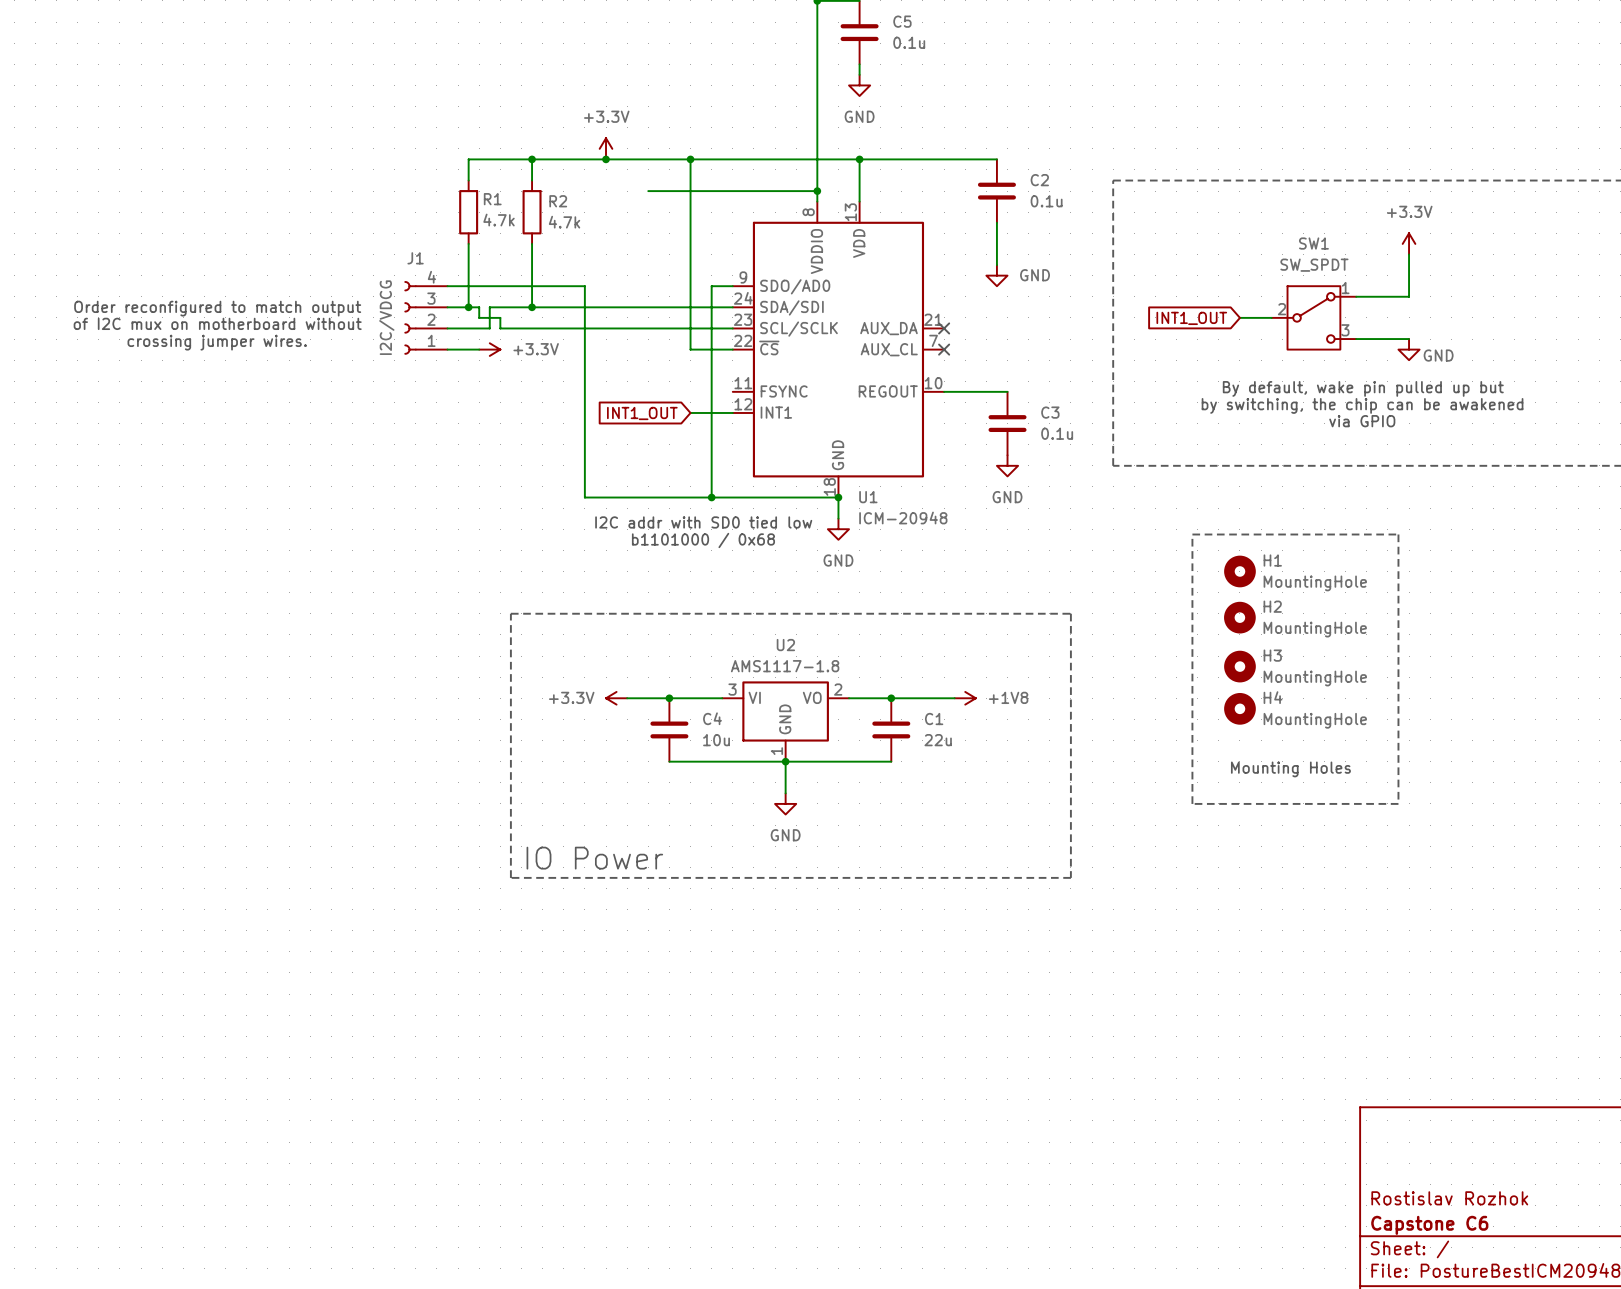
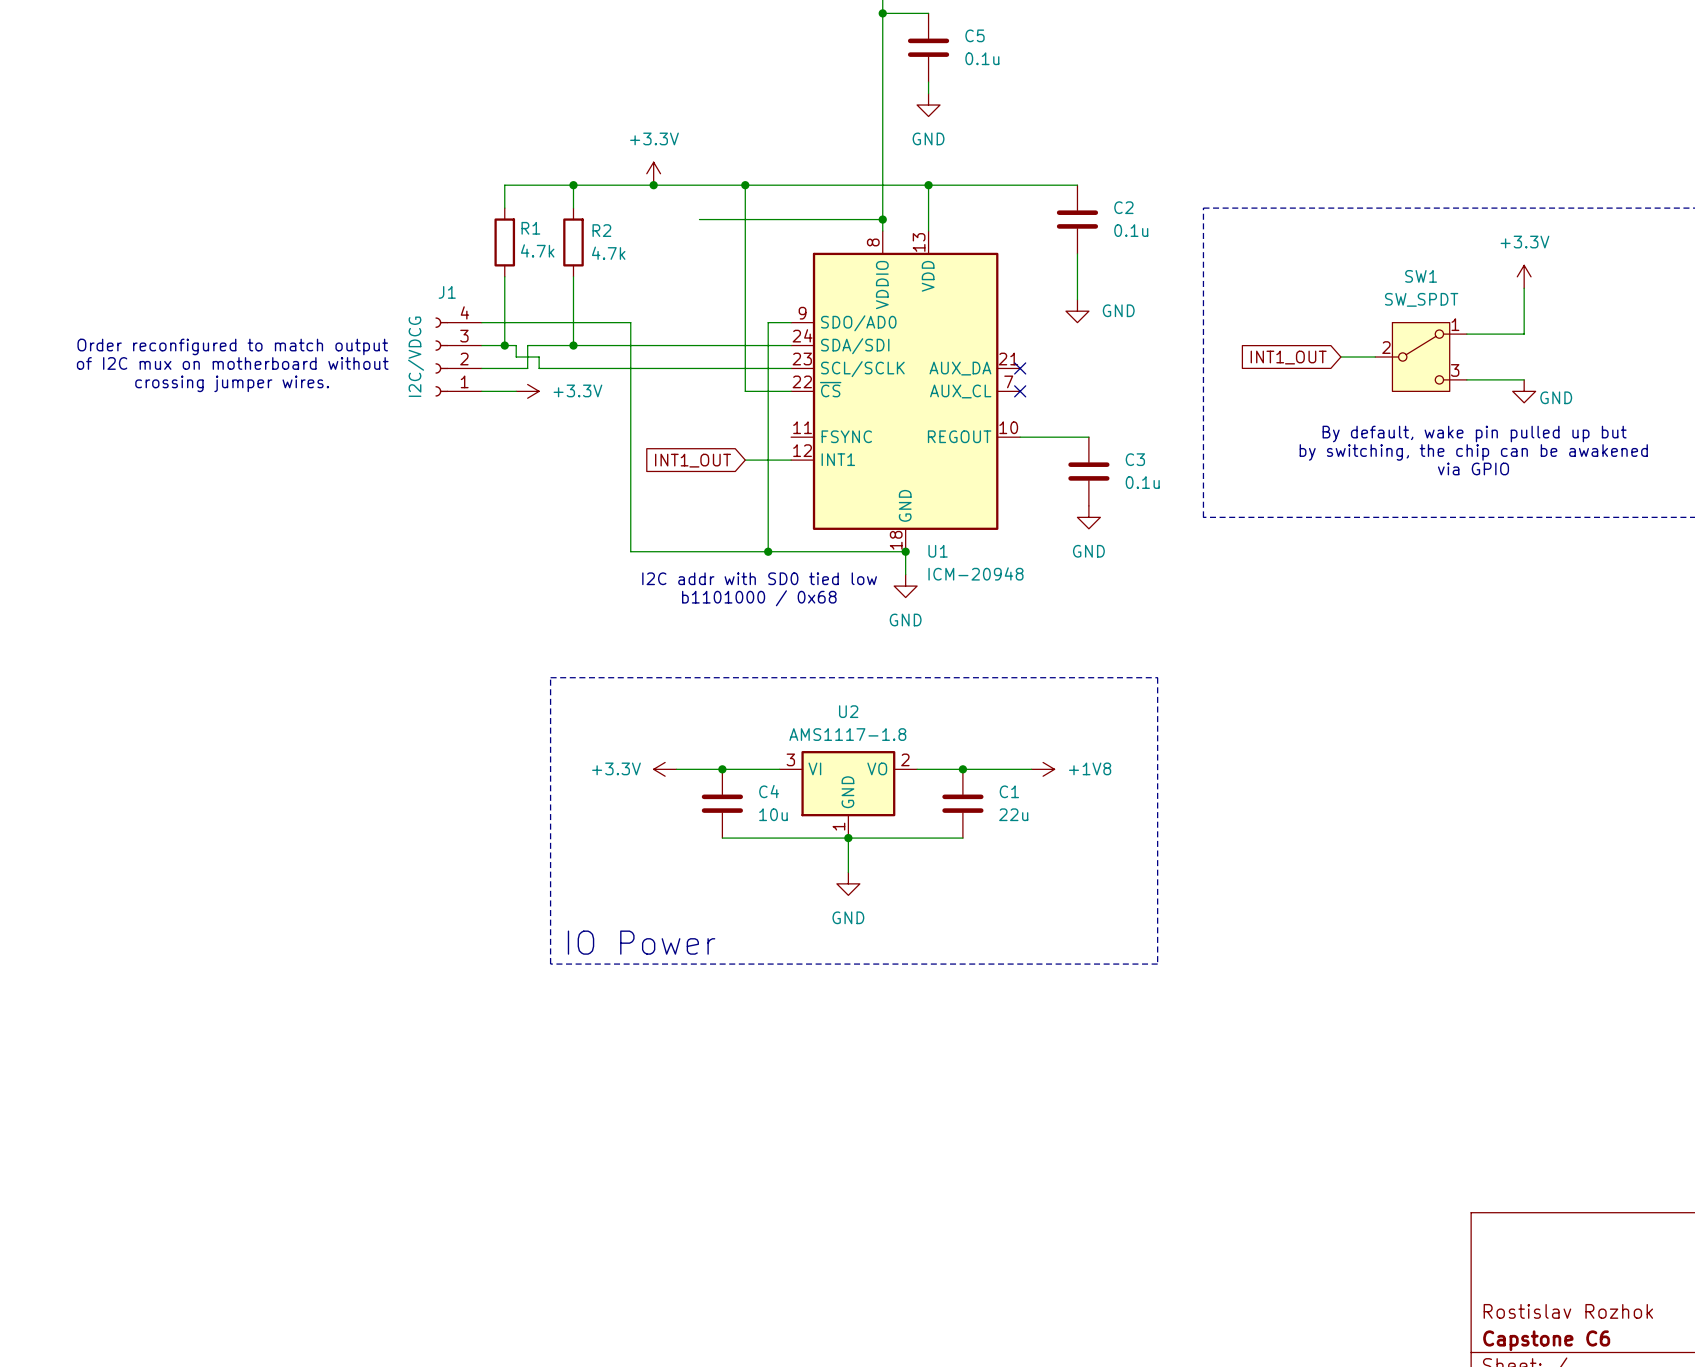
line: (1192, 534) (1398, 534) (1398, 803) (1192, 803) (1192, 534) -> none
H1: MountingHole (1239, 571) -> none
H2: MountingHole (1239, 617) -> none
H3: MountingHole (1239, 666) -> none
H4: MountingHole (1239, 708) -> none
text: Mounting Holes (1290, 769) -> none

